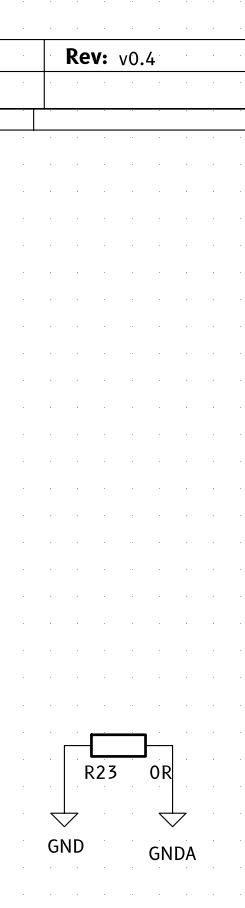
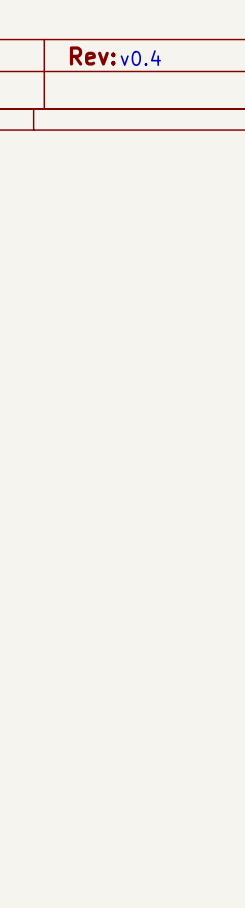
wire: (77, 745) (64, 745) (64, 799) -> none
R23: 0R (118, 745) -> none
wire: (159, 745) (172, 745) (172, 799) -> none
power symbol: GND (64, 813) -> none
power symbol: GNDA (172, 813) -> none

